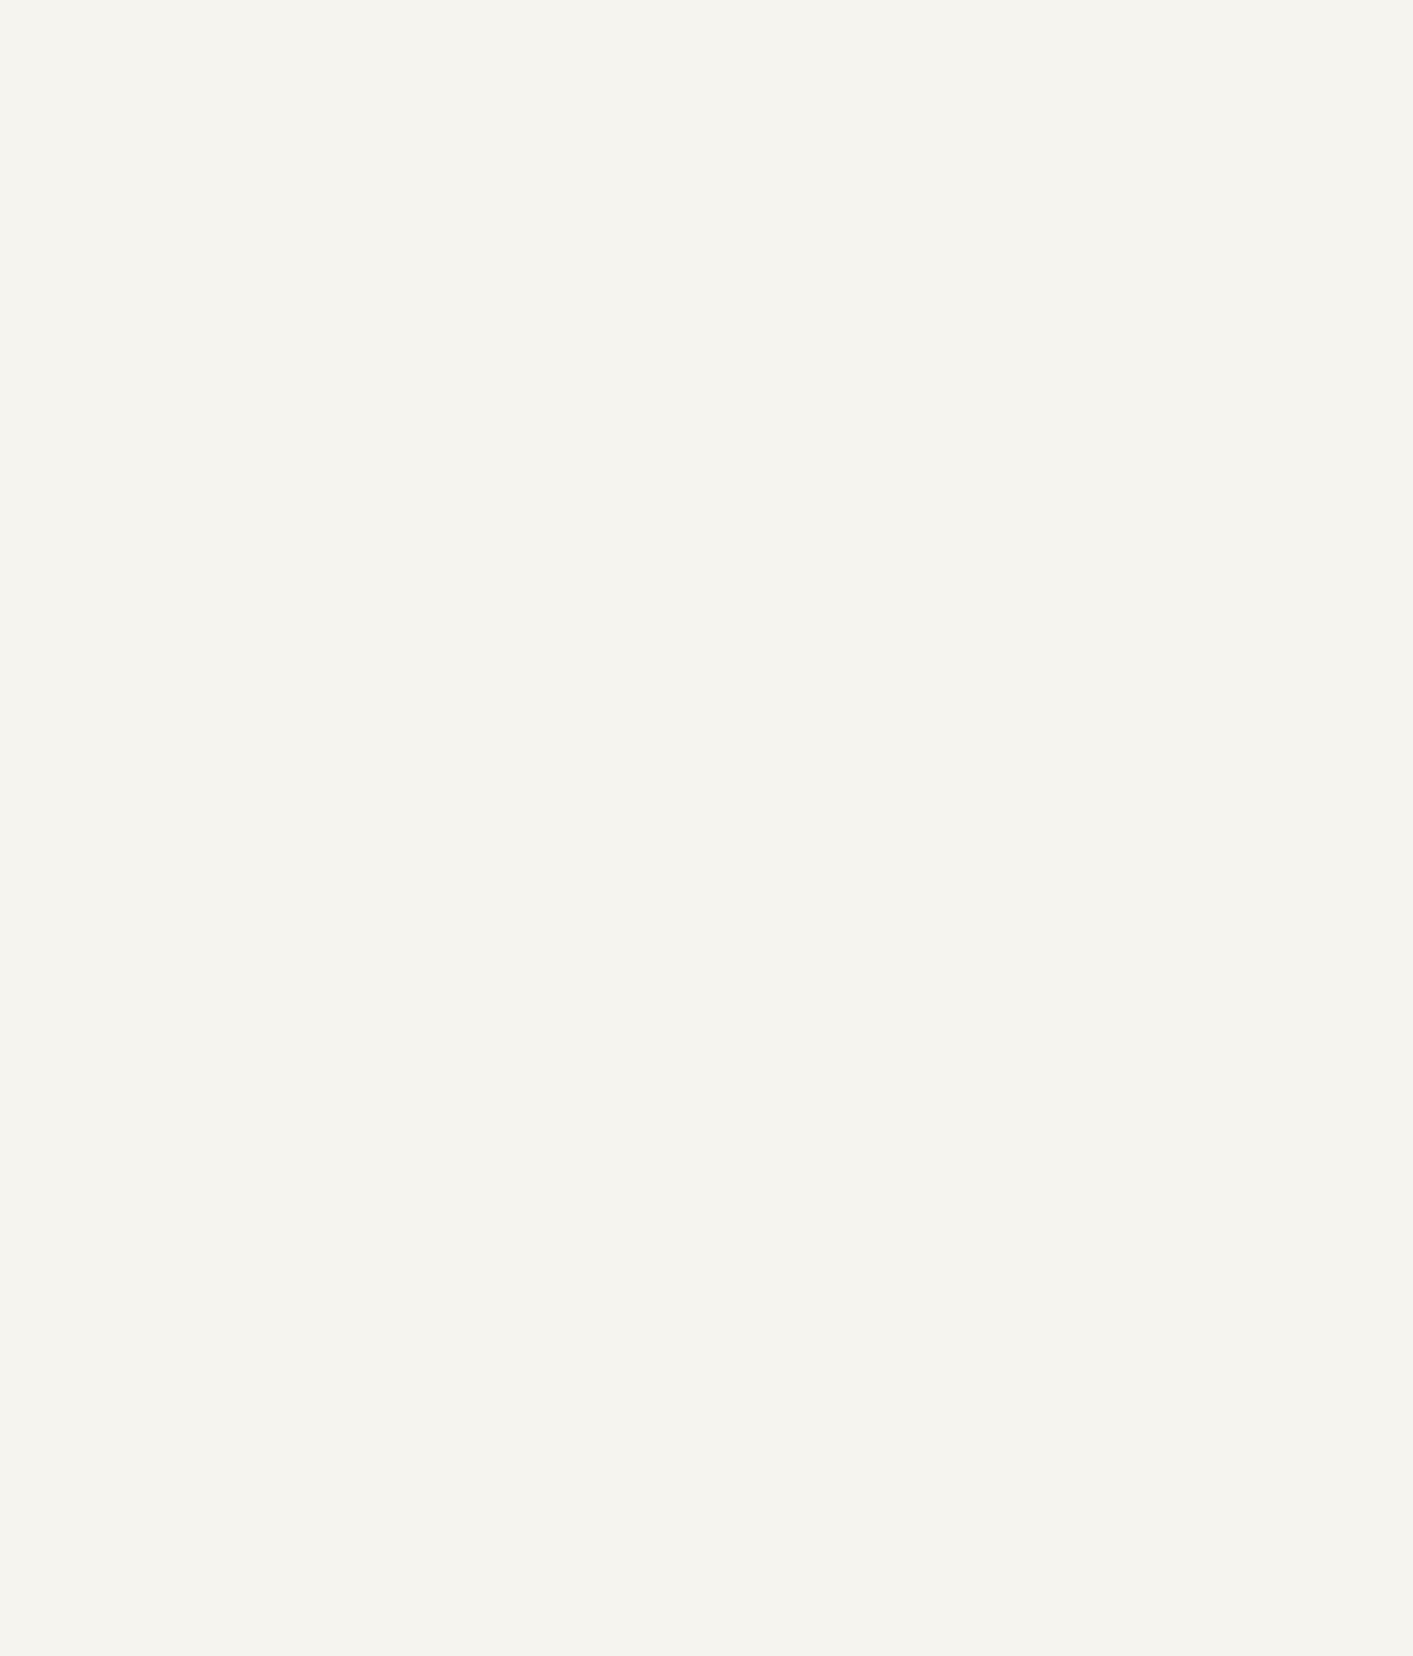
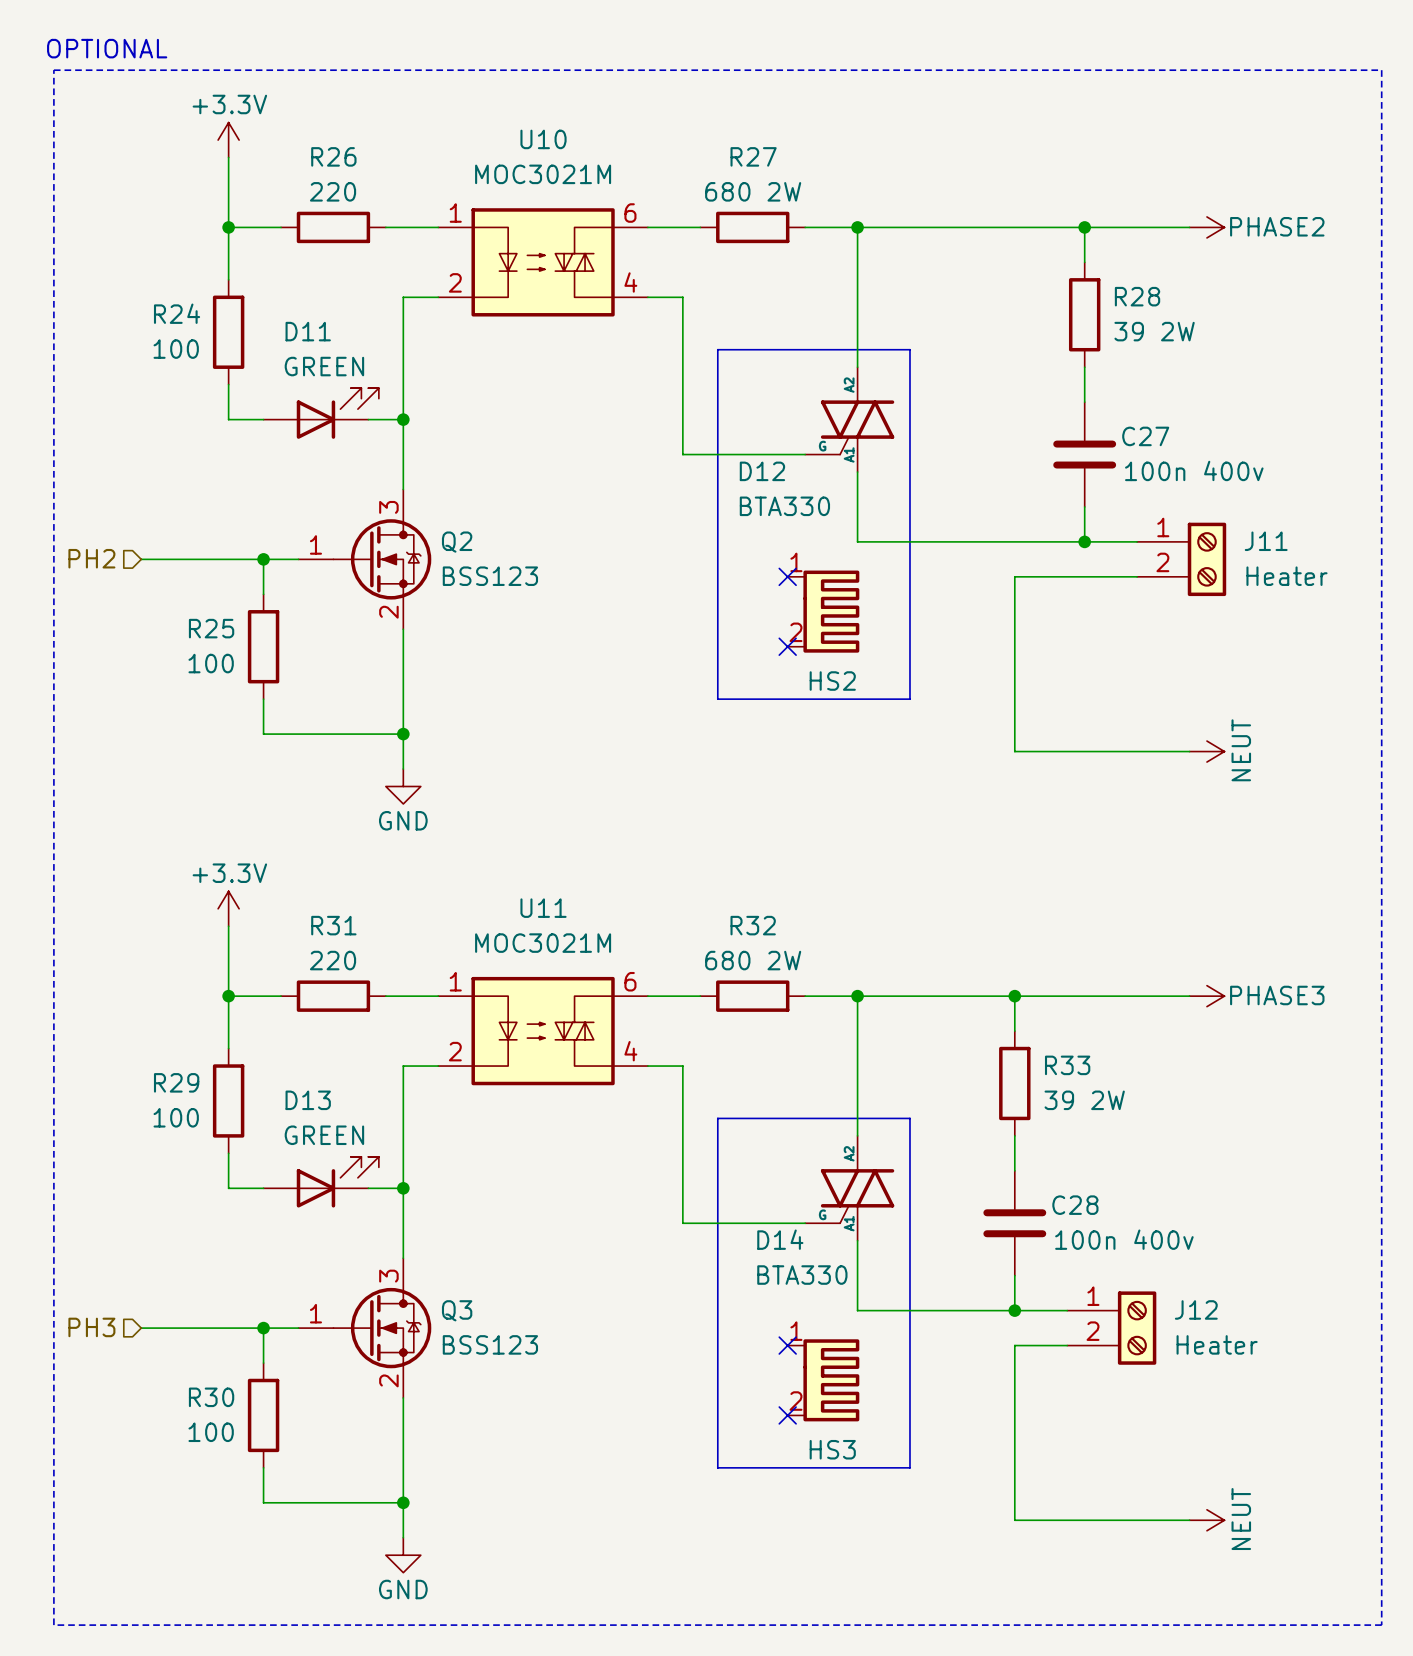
text: none -> OPTIONAL (107, 48)
line: none -> (53, 70) (1381, 70) (1381, 1625) (53, 1625) (53, 70)
power symbol: none -> +3.3V (228, 140)
wire: none -> (228, 157) (228, 279)
wire: none -> (228, 227) (281, 227)
junction: none -> (228, 227)
R26: none -> 220 (333, 227)
wire: none -> (385, 227) (438, 227)
wire: none -> (647, 227) (700, 227)
R27: none -> 680 2W (752, 227)
wire: none -> (805, 227) (1189, 227)
wire: none -> (857, 227) (857, 367)
junction: none -> (857, 227)
wire: none -> (1084, 227) (1084, 262)
junction: none -> (1084, 227)
power symbol: none -> PHASE2 (1206, 227)
U10: none -> MOC3021M (543, 262)
wire: none -> (438, 297) (403, 297) (403, 489)
wire: none -> (647, 297) (682, 297) (682, 454) (805, 454)
R28: none -> 39 2W (1084, 314)
R24: none -> 100 (228, 332)
line: none -> (717, 349) (909, 349) (909, 699) (717, 699) (717, 349)
wire: none -> (1084, 367) (1084, 402)
wire: none -> (228, 384) (228, 419) (263, 419)
D11: none -> GREEN (321, 413)
wire: none -> (368, 419) (403, 419)
junction: none -> (403, 419)
D12: none -> BTA330 (849, 419)
C27: none -> 100n 400v (1084, 454)
wire: none -> (857, 472) (857, 541) (1137, 541)
wire: none -> (1084, 506) (1084, 541)
junction: none -> (1084, 541)
hierarchical label: none -> PH2 (91, 558)
wire: none -> (141, 559) (298, 559)
wire: none -> (263, 559) (263, 594)
junction: none -> (263, 559)
Q2: none -> BSS123 (364, 559)
J11: none -> Heater (1181, 559)
no-connect mark: none -> (787, 576)
wire: none -> (1137, 576) (1014, 576) (1014, 751) (1189, 751)
HS2: none -> (823, 611)
wire: none -> (403, 629) (403, 769)
R25: none -> 100 (263, 646)
no-connect mark: none -> (787, 646)
wire: none -> (263, 699) (263, 734) (403, 734)
junction: none -> (403, 734)
power symbol: none -> NEUT (1206, 751)
power symbol: none -> GND (403, 786)
power symbol: none -> +3.3V (228, 908)
wire: none -> (228, 926) (228, 1048)
wire: none -> (228, 996) (281, 996)
junction: none -> (228, 996)
R31: none -> 220 (333, 996)
wire: none -> (385, 996) (438, 996)
wire: none -> (647, 996) (700, 996)
R32: none -> 680 2W (752, 996)
wire: none -> (805, 996) (1189, 996)
wire: none -> (857, 996) (857, 1135)
junction: none -> (857, 996)
wire: none -> (1014, 996) (1014, 1031)
junction: none -> (1014, 996)
power symbol: none -> PHASE3 (1206, 996)
U11: none -> MOC3021M (543, 1031)
wire: none -> (438, 1066) (403, 1066) (403, 1258)
wire: none -> (647, 1066) (682, 1066) (682, 1223) (805, 1223)
R33: none -> 39 2W (1014, 1083)
R29: none -> 100 (228, 1100)
line: none -> (717, 1118) (717, 1467) (909, 1467) (909, 1118) (717, 1118)
wire: none -> (1014, 1135) (1014, 1170)
wire: none -> (228, 1153) (228, 1188) (263, 1188)
D13: none -> GREEN (321, 1182)
wire: none -> (368, 1188) (403, 1188)
junction: none -> (403, 1188)
D14: none -> BTA330 (849, 1188)
C28: none -> 100n 400v (1014, 1223)
wire: none -> (857, 1240) (857, 1310) (1067, 1310)
wire: none -> (1014, 1275) (1014, 1310)
junction: none -> (1014, 1310)
hierarchical label: none -> PH3 (91, 1327)
wire: none -> (141, 1328) (298, 1328)
wire: none -> (263, 1328) (263, 1363)
junction: none -> (263, 1328)
Q3: none -> BSS123 (364, 1328)
J12: none -> Heater (1111, 1328)
no-connect mark: none -> (787, 1345)
wire: none -> (1067, 1345) (1014, 1345) (1014, 1520) (1189, 1520)
HS3: none -> (823, 1380)
wire: none -> (403, 1397) (403, 1537)
R30: none -> 100 (263, 1415)
no-connect mark: none -> (787, 1415)
wire: none -> (263, 1467) (263, 1502) (403, 1502)
junction: none -> (403, 1502)
power symbol: none -> NEUT (1206, 1520)
power symbol: none -> GND (403, 1555)

